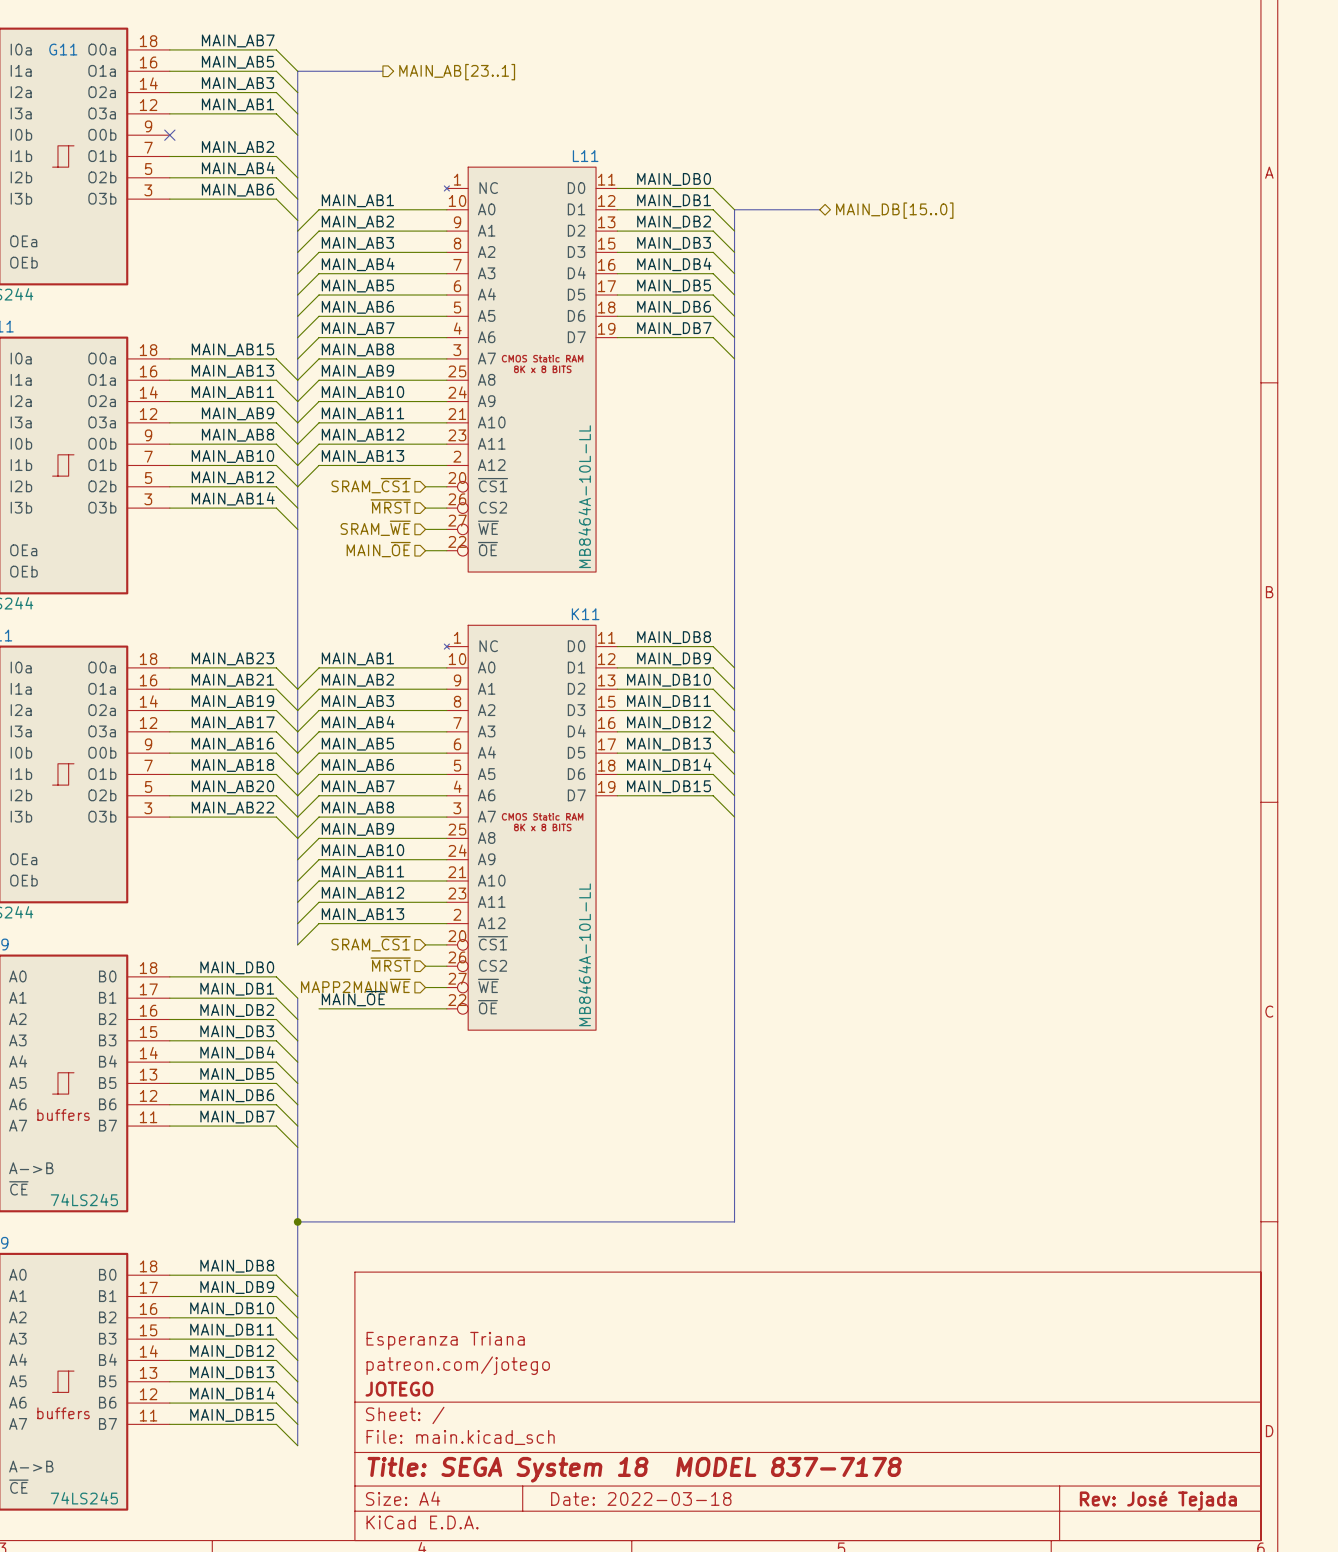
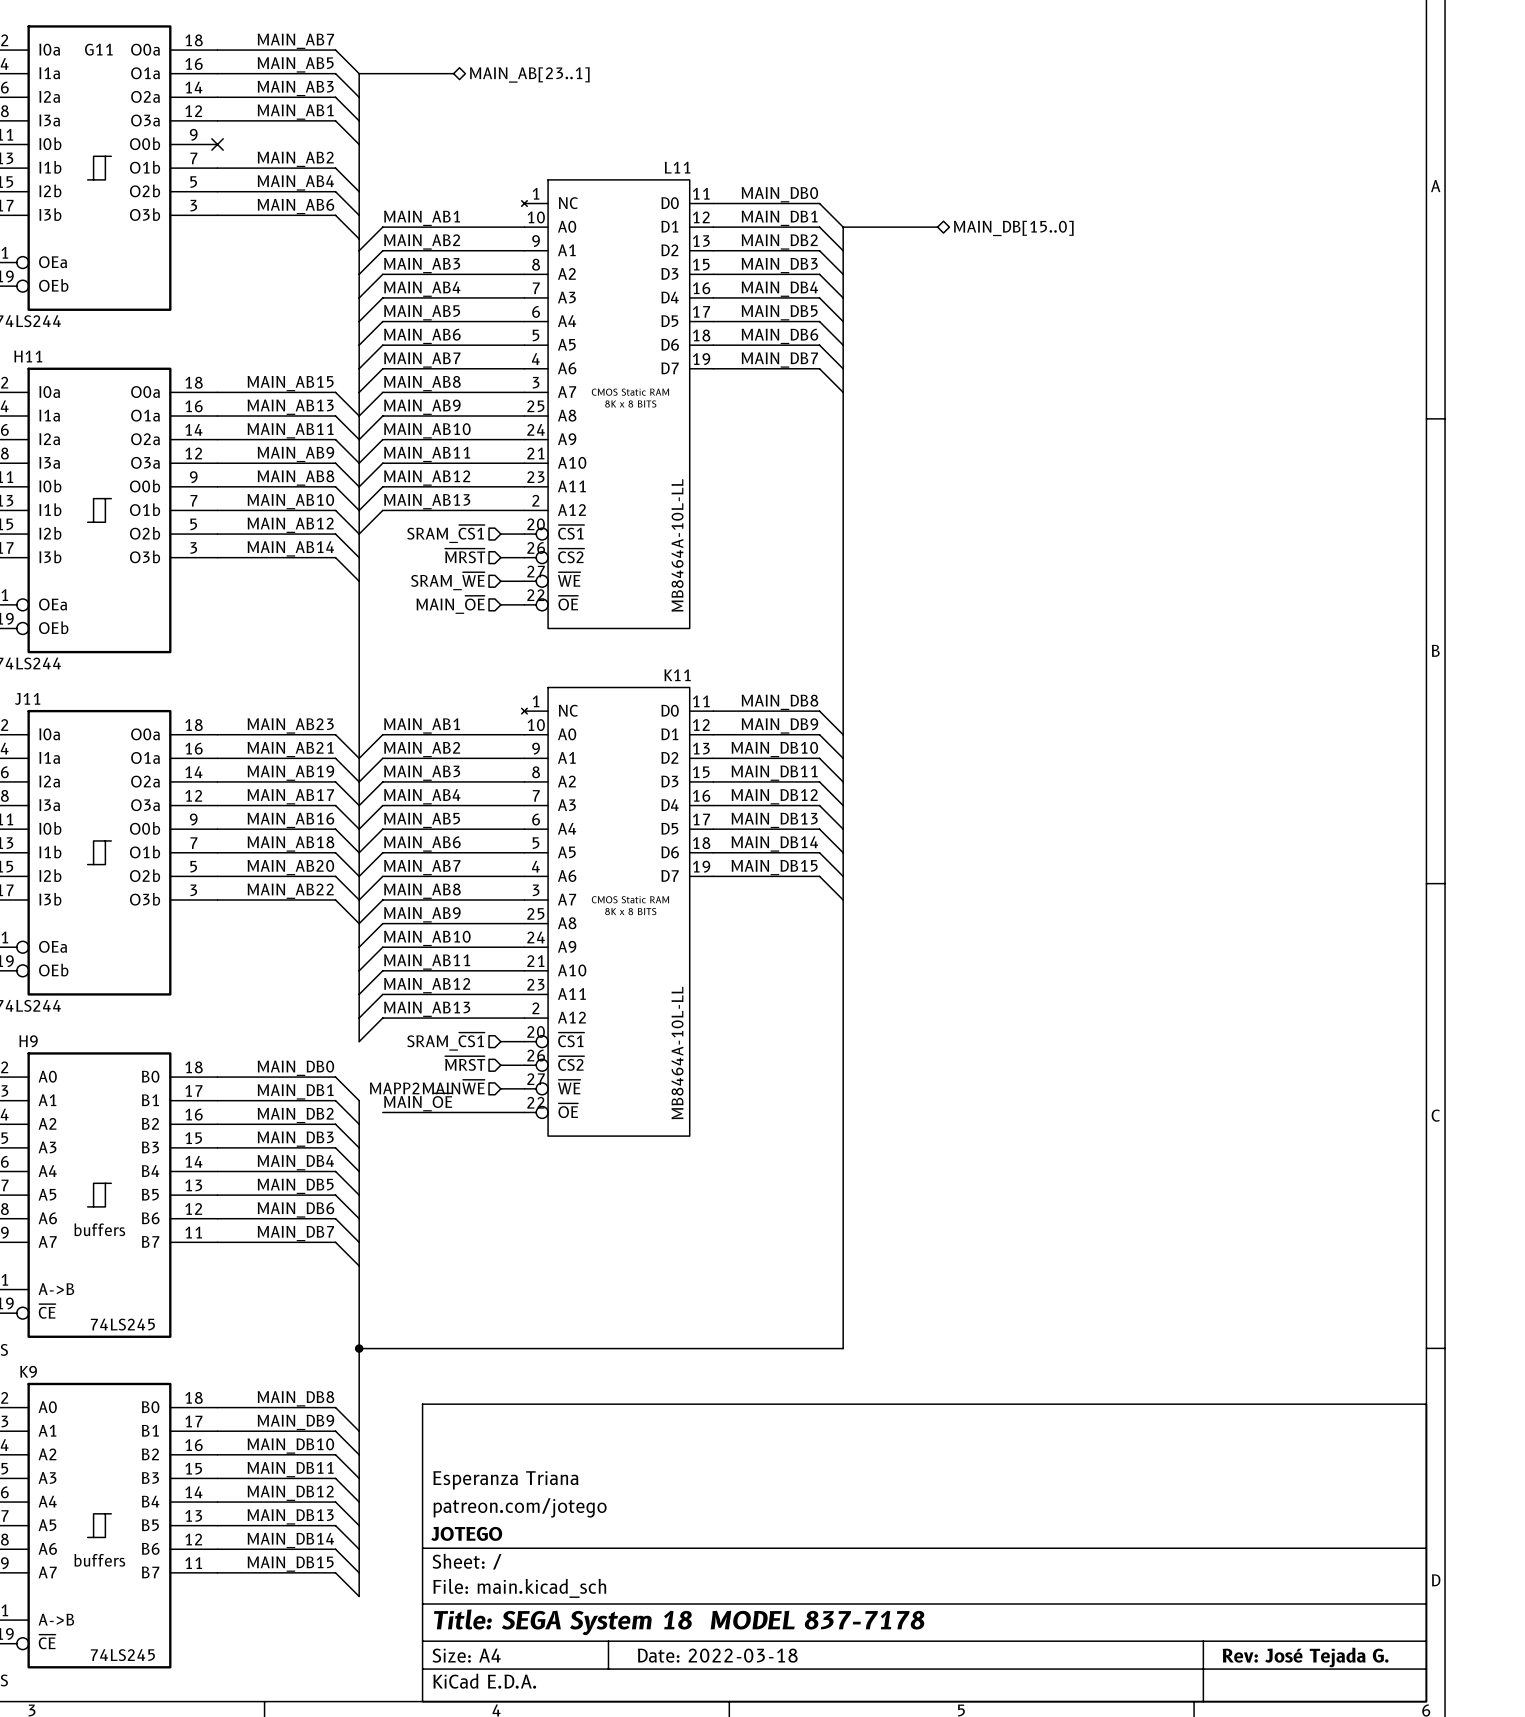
hierarchical label shape: output (457, 72) -> bidirectional (529, 74)
L11 pin name: CS2 (493, 507) -> ~{CS2} (571, 555)
K11 pin name: CS2 (493, 965) -> ~{CS2} (571, 1063)
title block: Rev: José Tejada (1158, 1500) -> Rev: José Tejada G. (1305, 1657)

